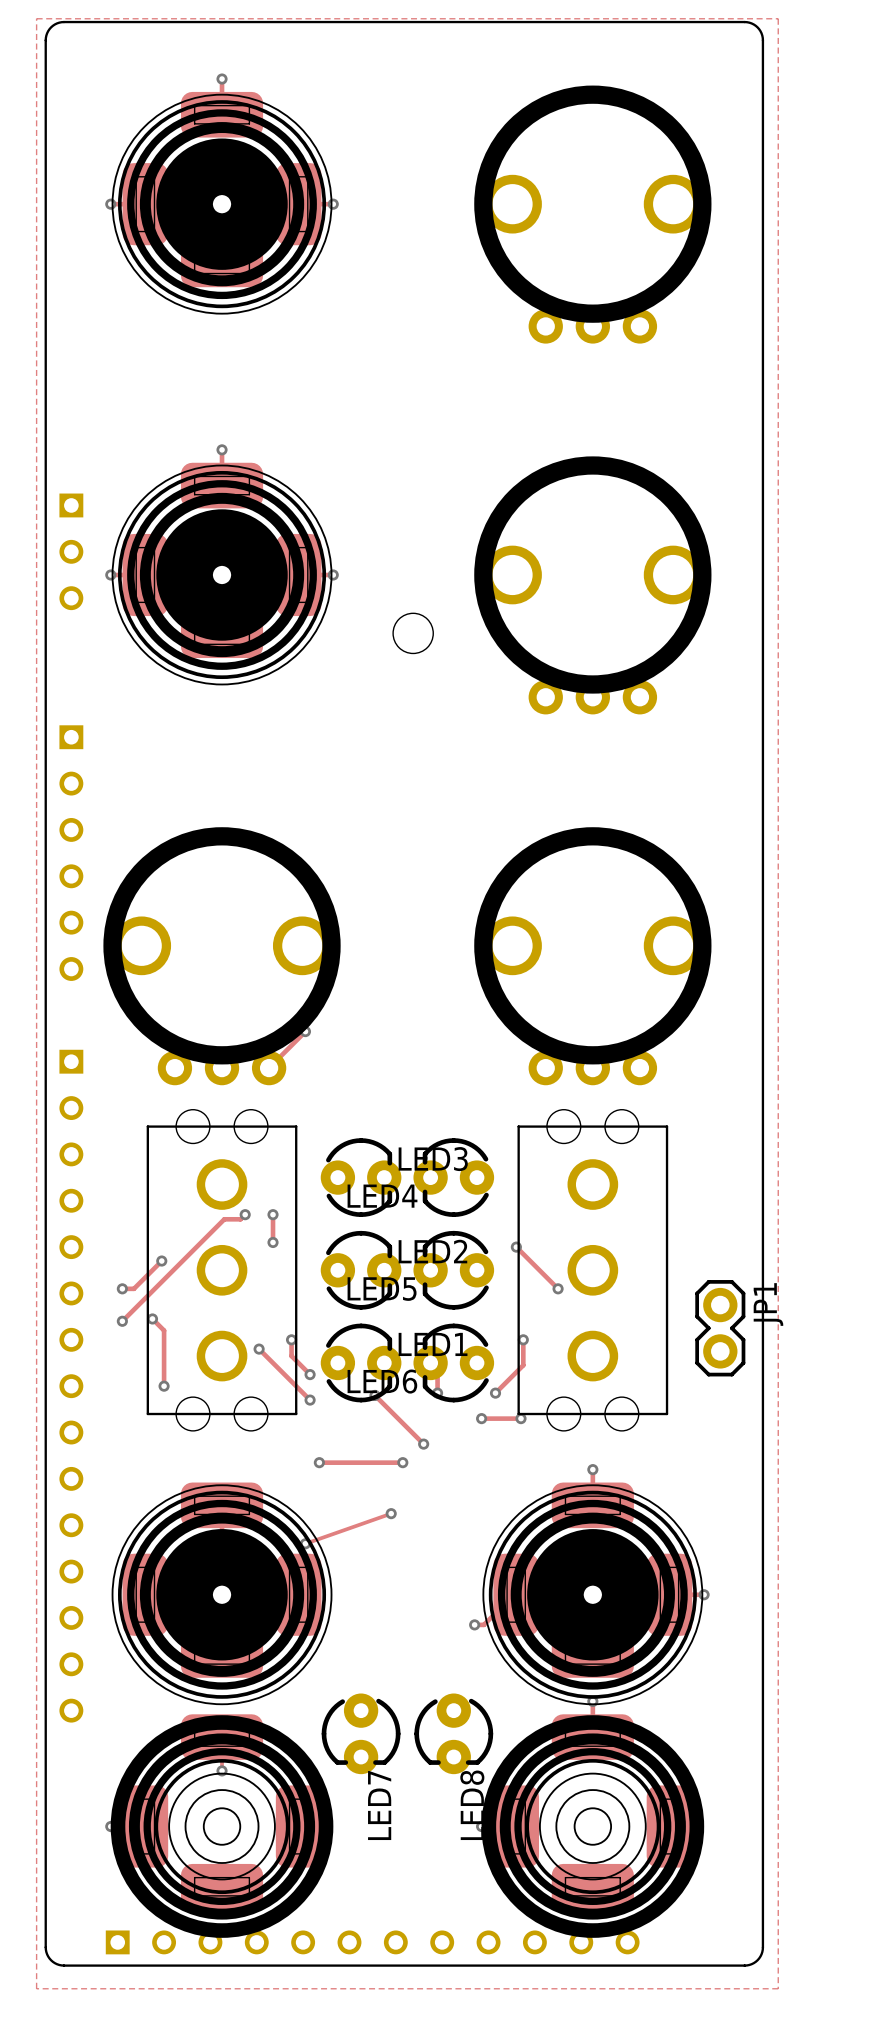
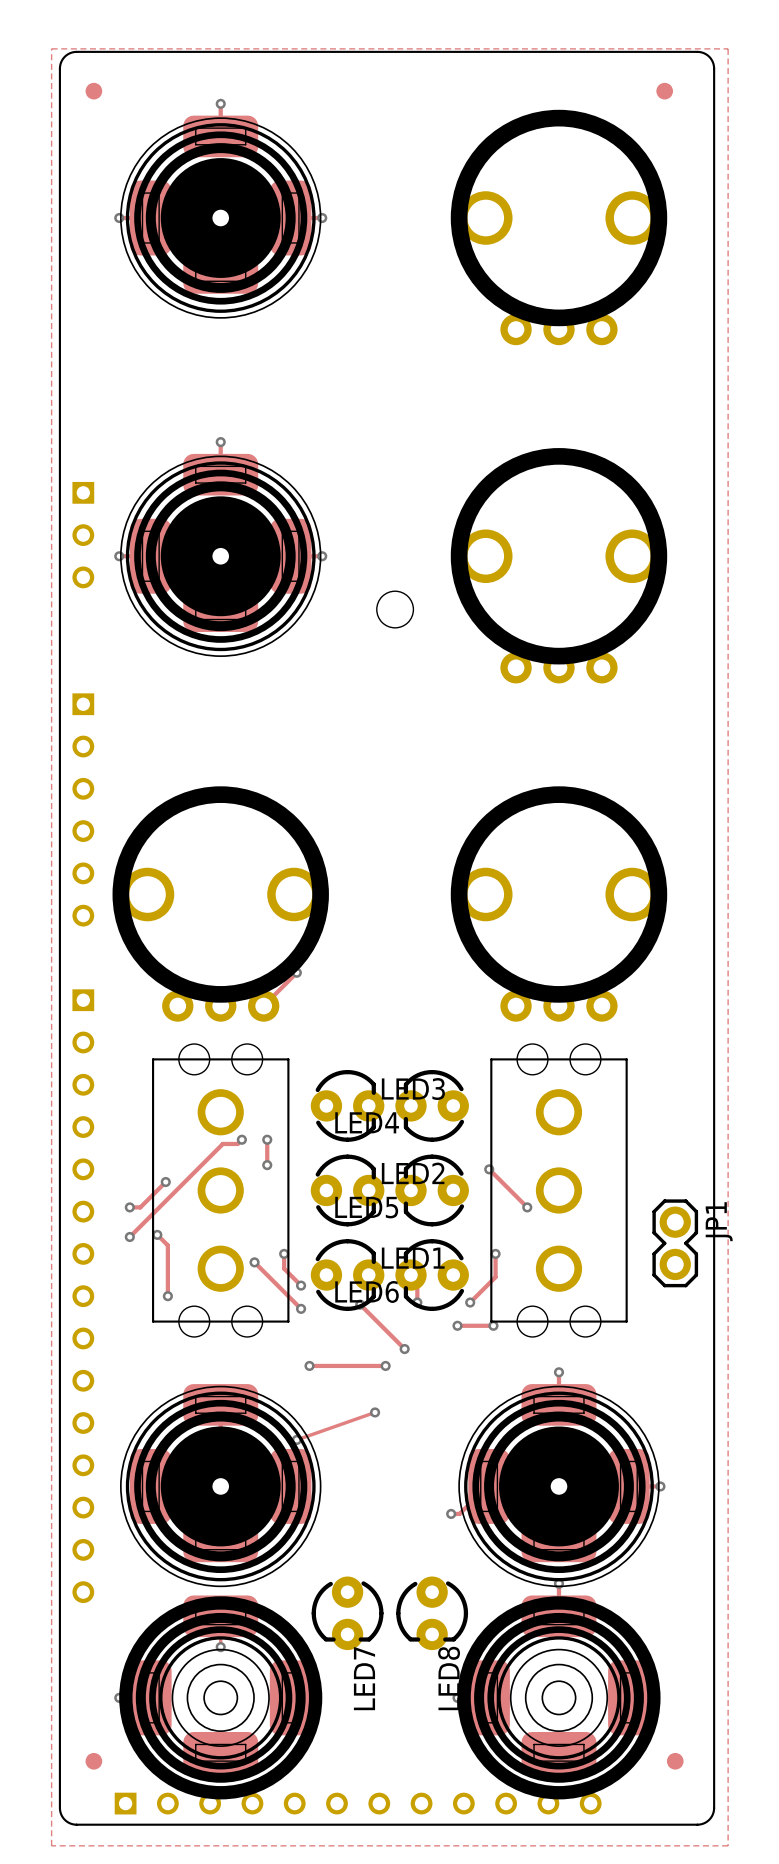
part: none -> (93, 91)
part: none -> (664, 91)
part: none -> (93, 1761)
part: none -> (675, 1761)

